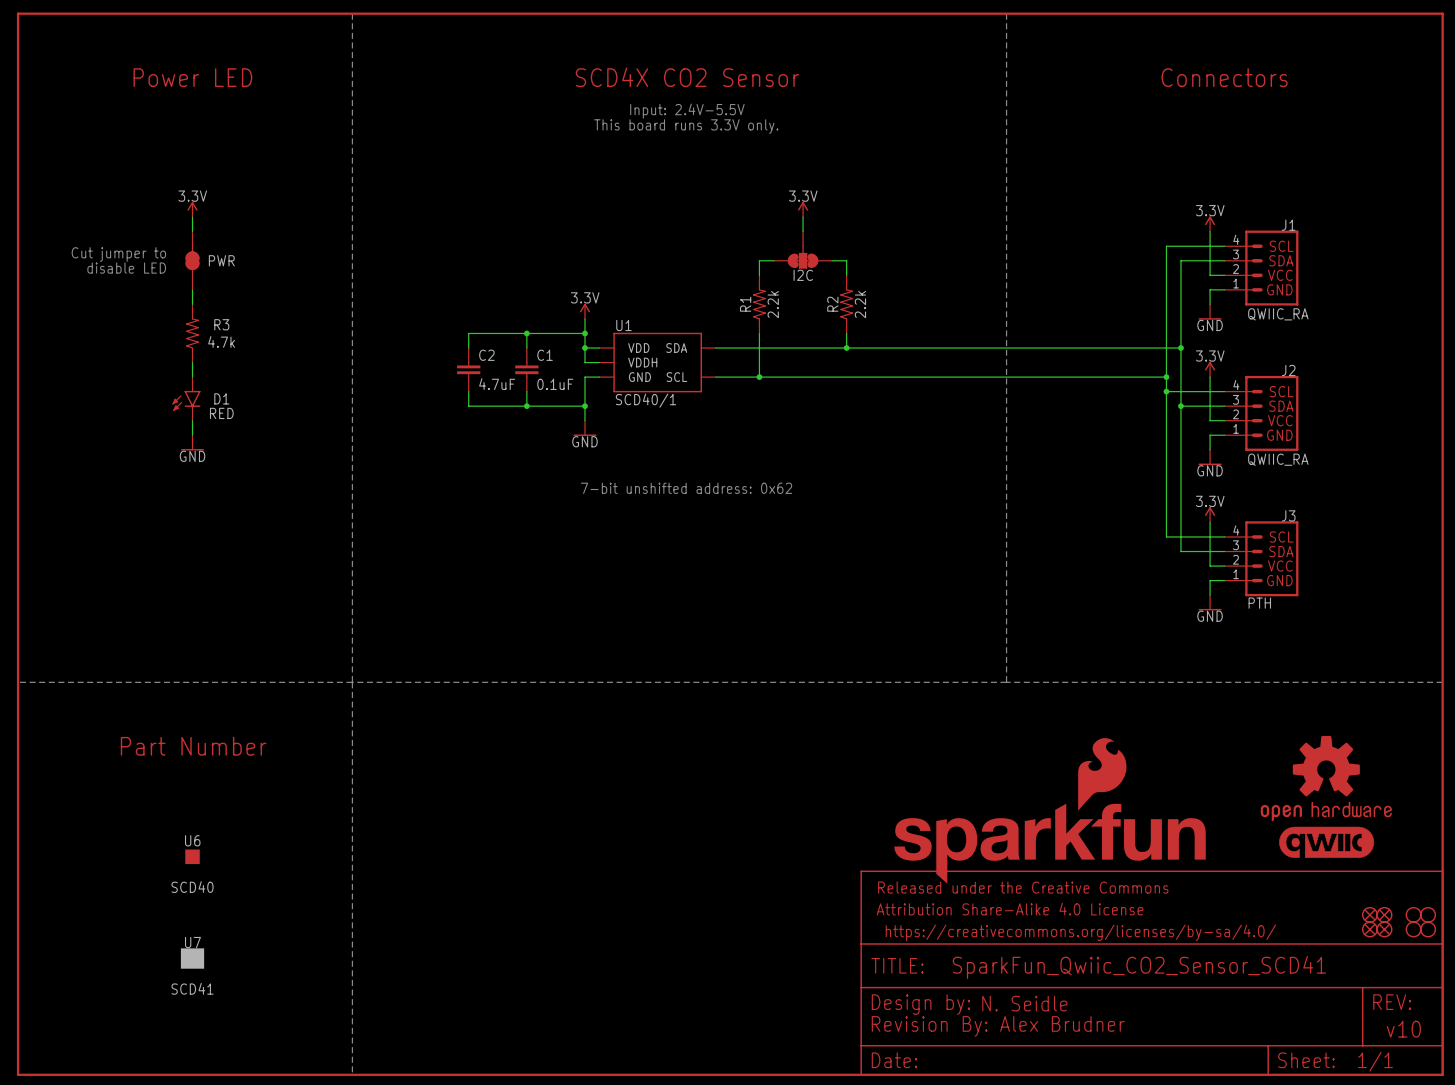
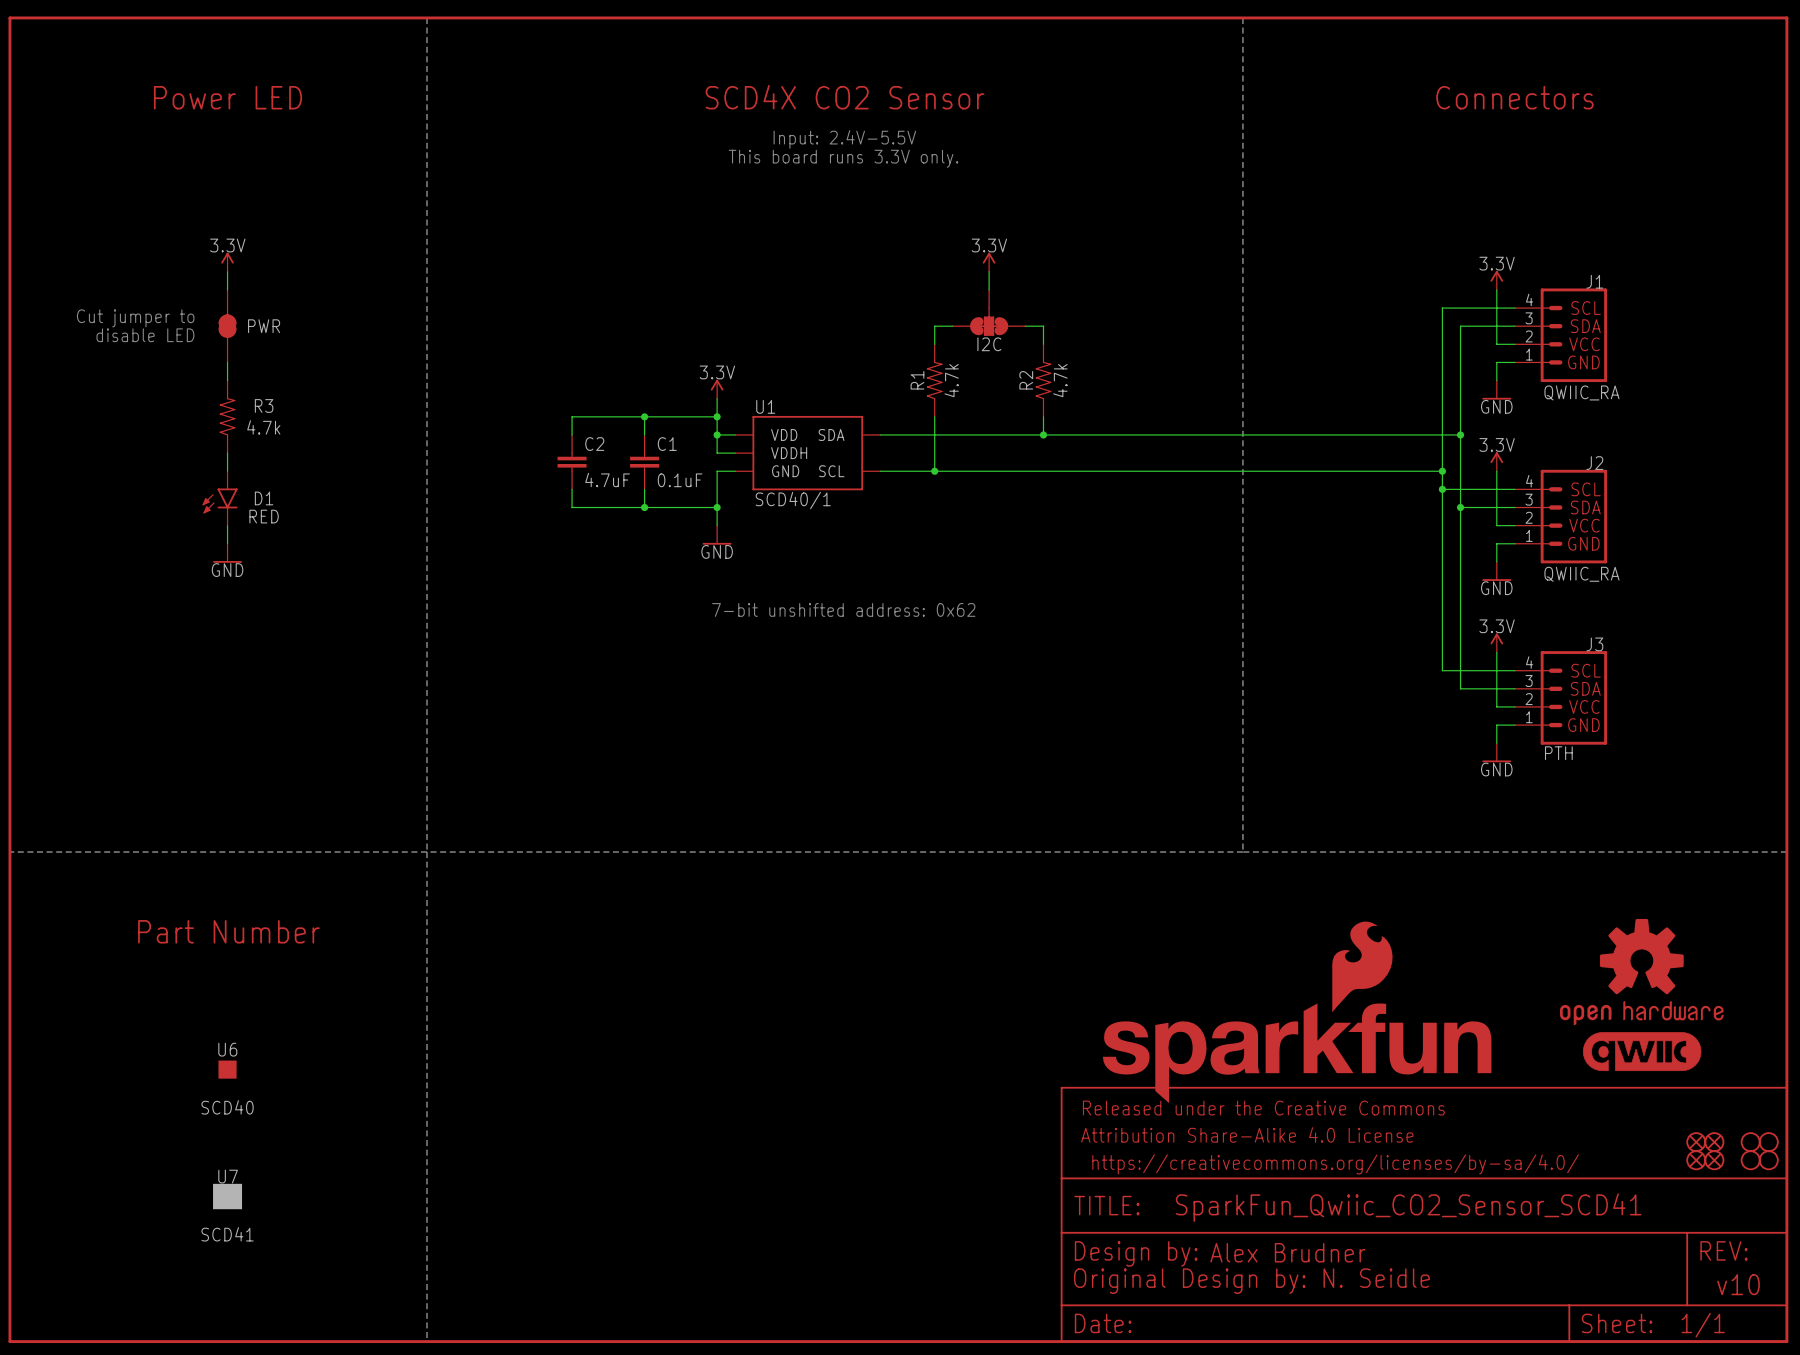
R1 value: 2.2k (773, 304) -> 4.7k (951, 380)
R2 value: 2.2k (860, 304) -> 4.7k (1060, 380)
part text: N. Seidle (1024, 1003) -> Alex Brudner (1287, 1252)
part text: Revision By: Alex Brudner (998, 1026) -> Original Design by: N. Seidle (1251, 1281)

